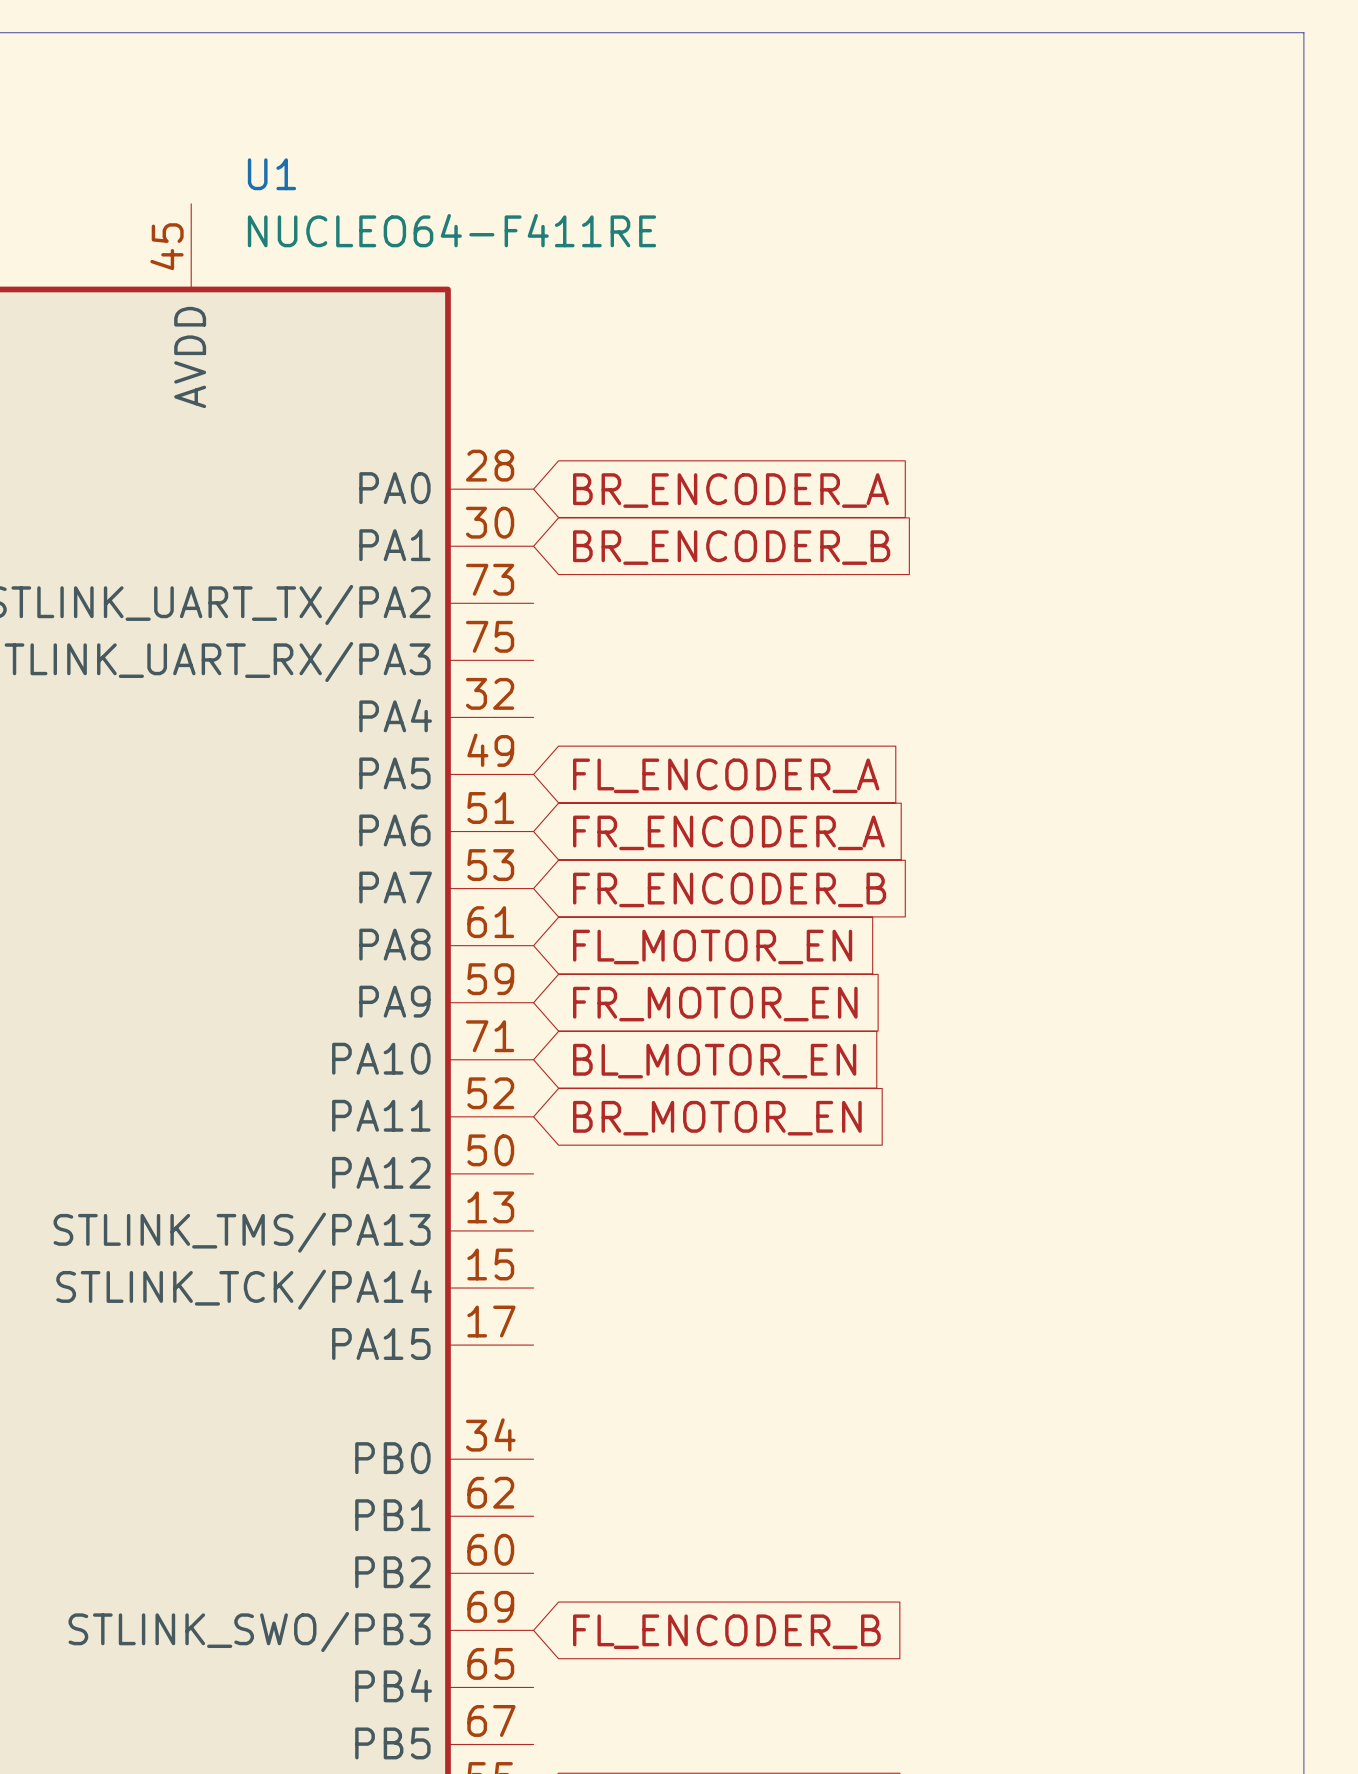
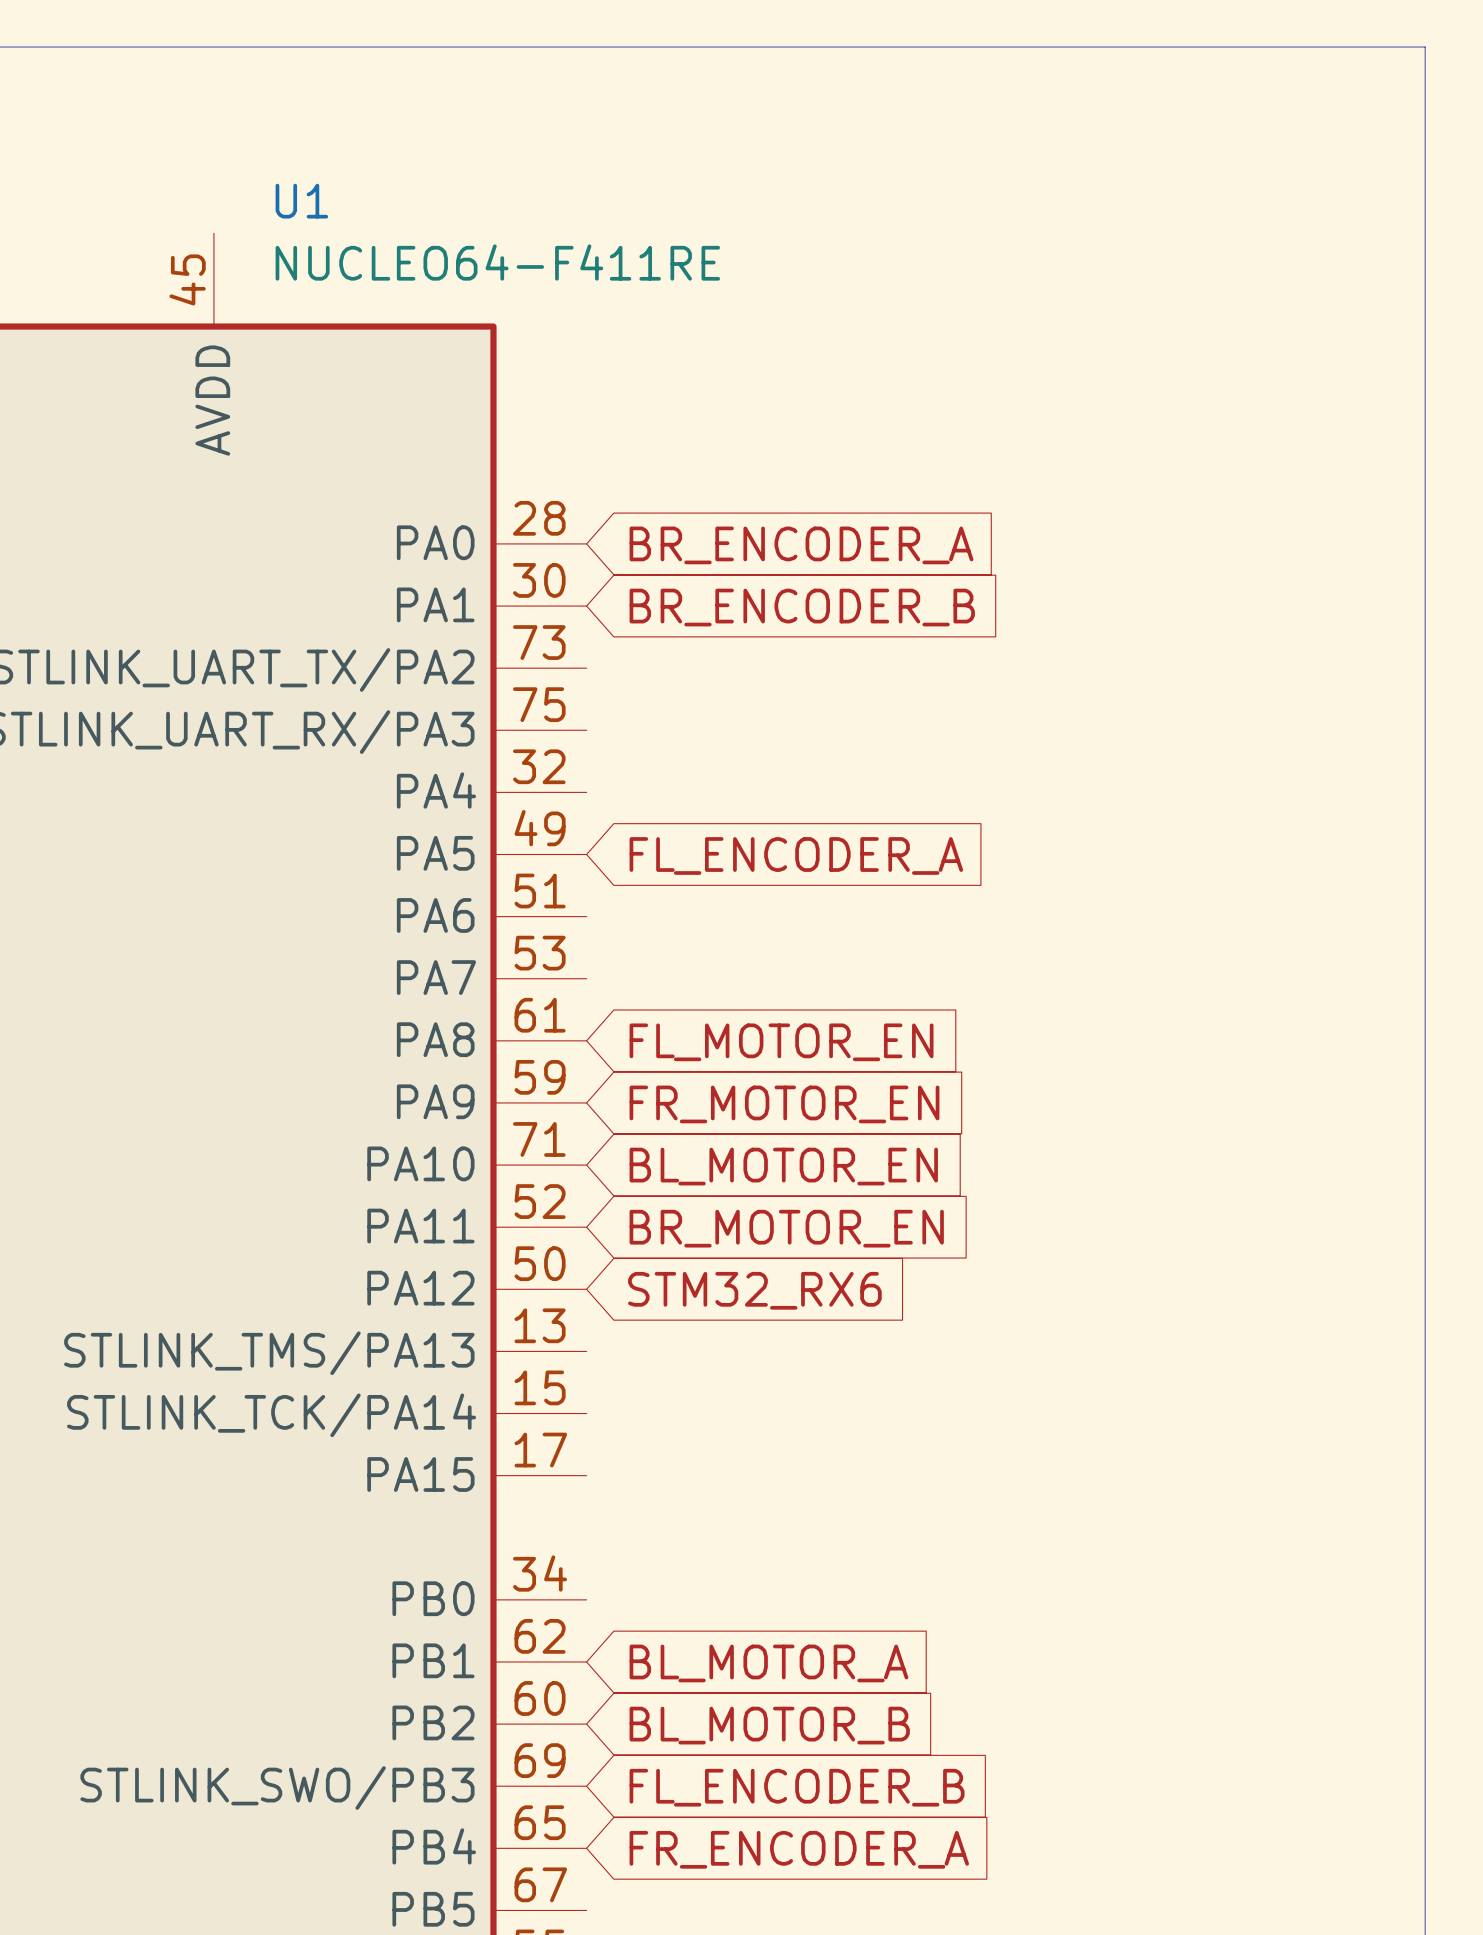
global label: FR_ENCODER_A (728, 832) -> none
global label: FR_ENCODER_B (729, 889) -> none
global label: none -> STM32_RX6 (754, 1290)
global label: none -> BL_MOTOR_A (768, 1663)
global label: none -> BL_MOTOR_B (769, 1725)
global label: none -> FR_ENCODER_A (799, 1849)

